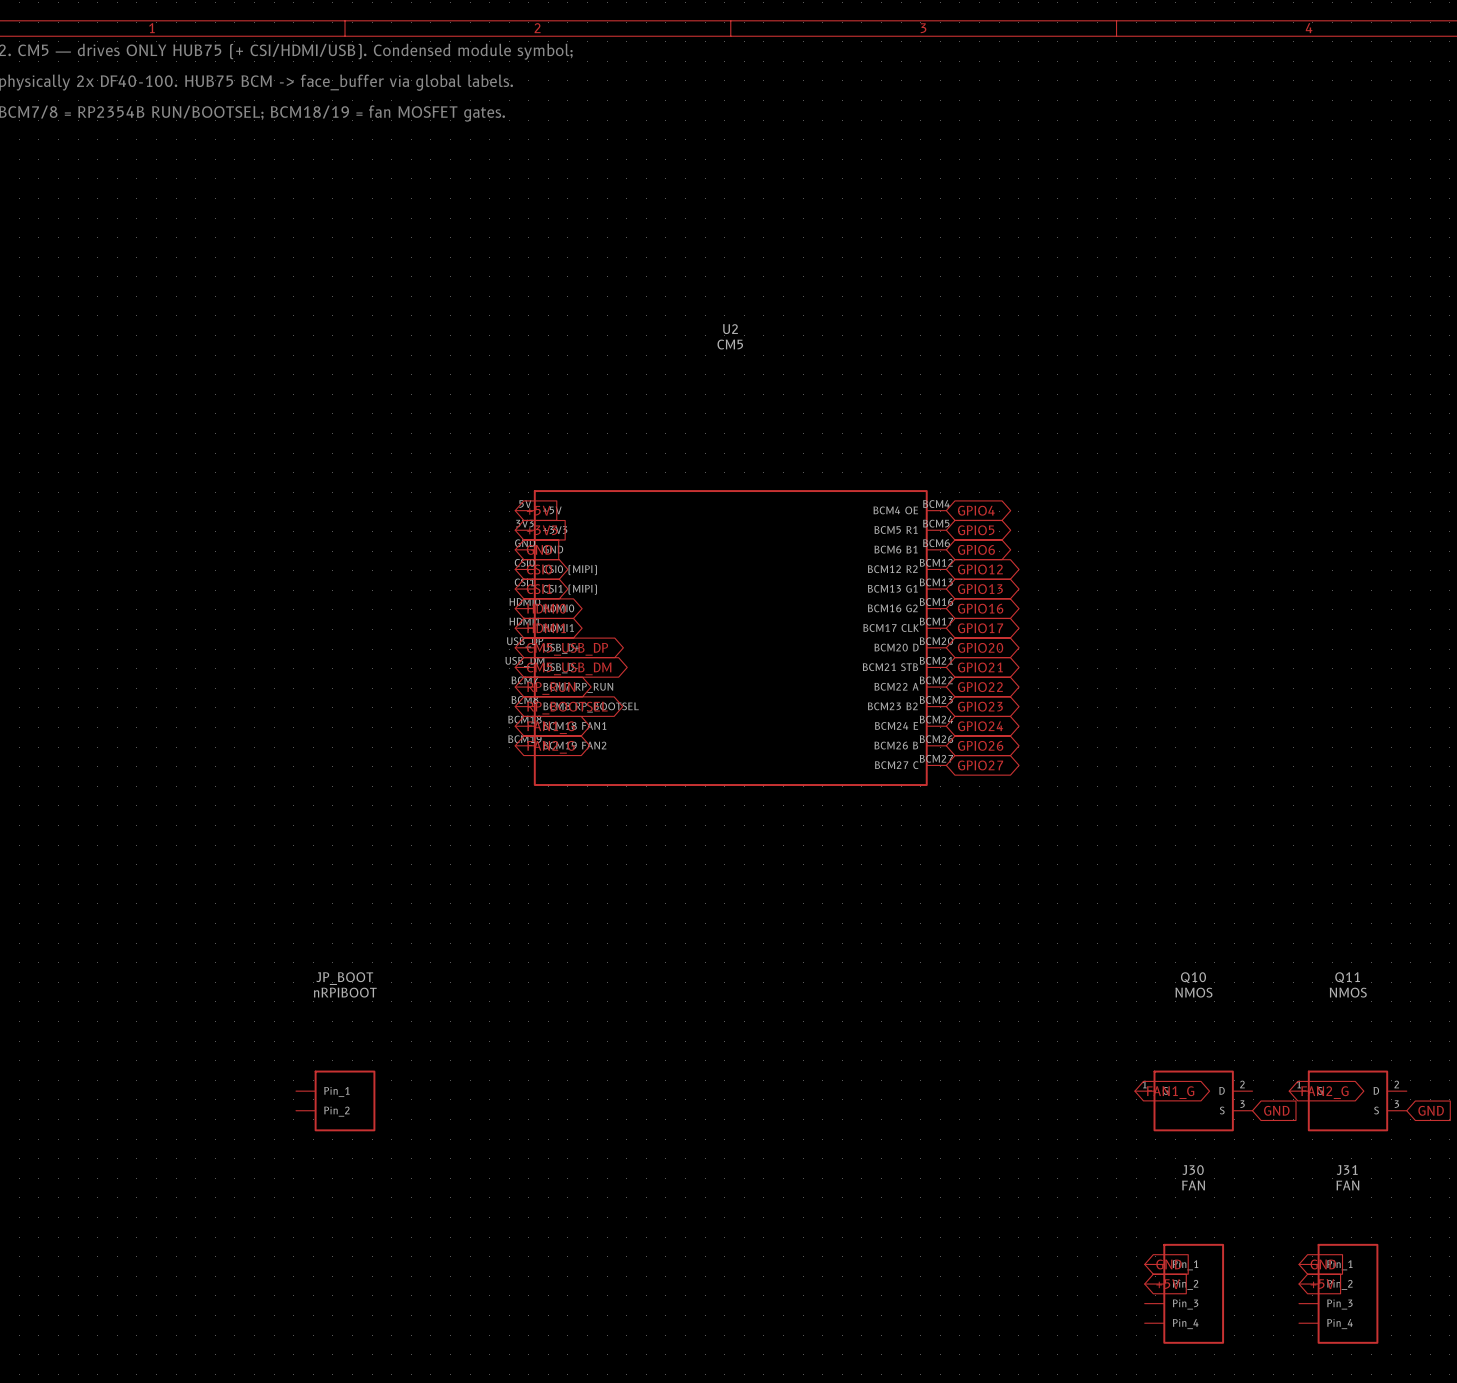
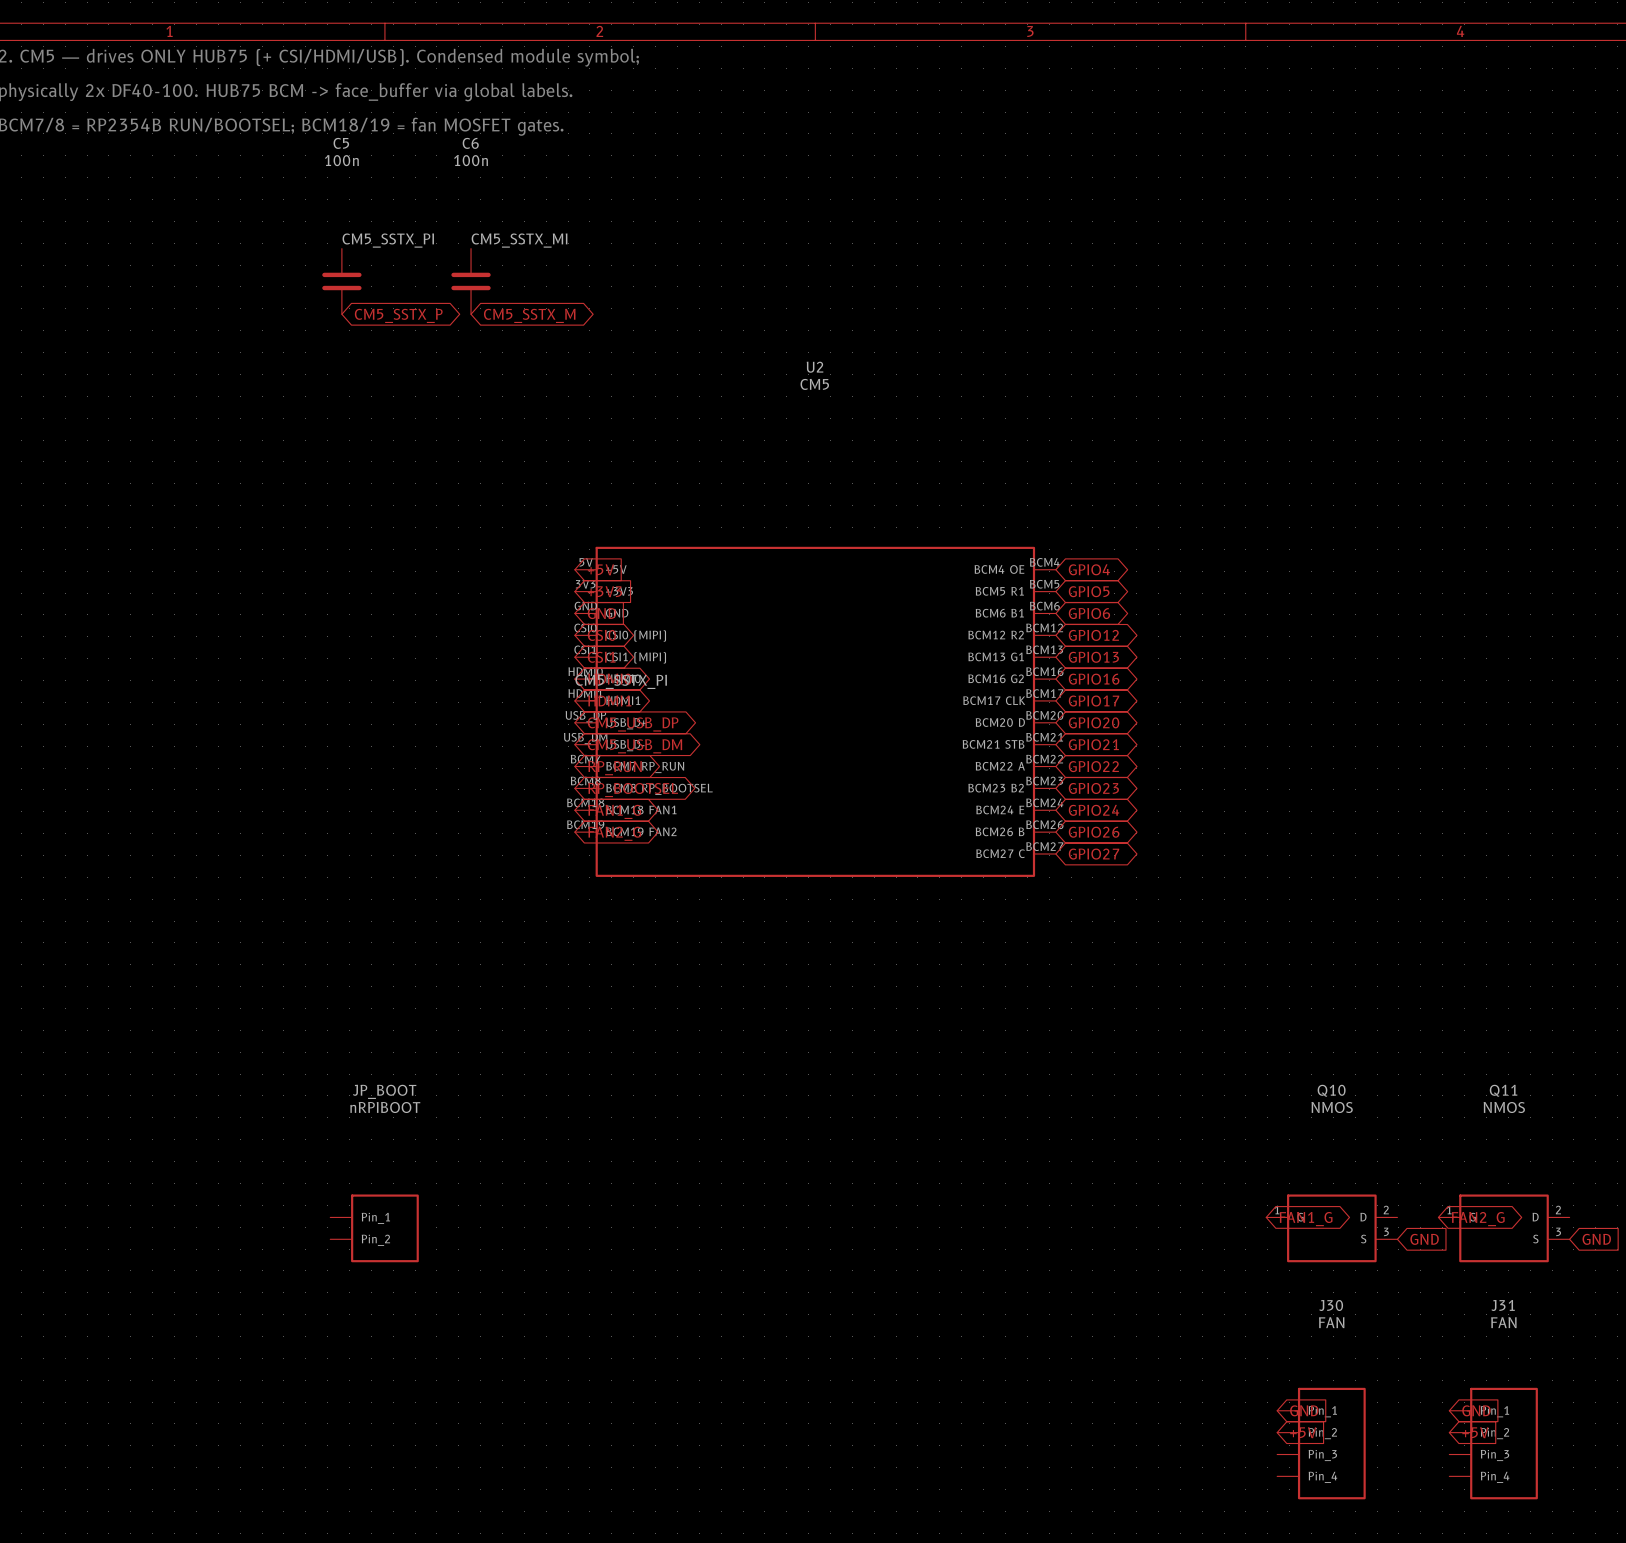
label: none -> CM5_SSTX_PI (388, 240)
label: none -> CM5_SSTX_MI (519, 240)
C5: none -> 100n (341, 281)
C6: none -> 100n (471, 281)
global label: none -> CM5_SSTX_P (398, 315)
global label: none -> CM5_SSTX_M (529, 315)
label: none -> CM5_SSTX_PI (621, 681)

